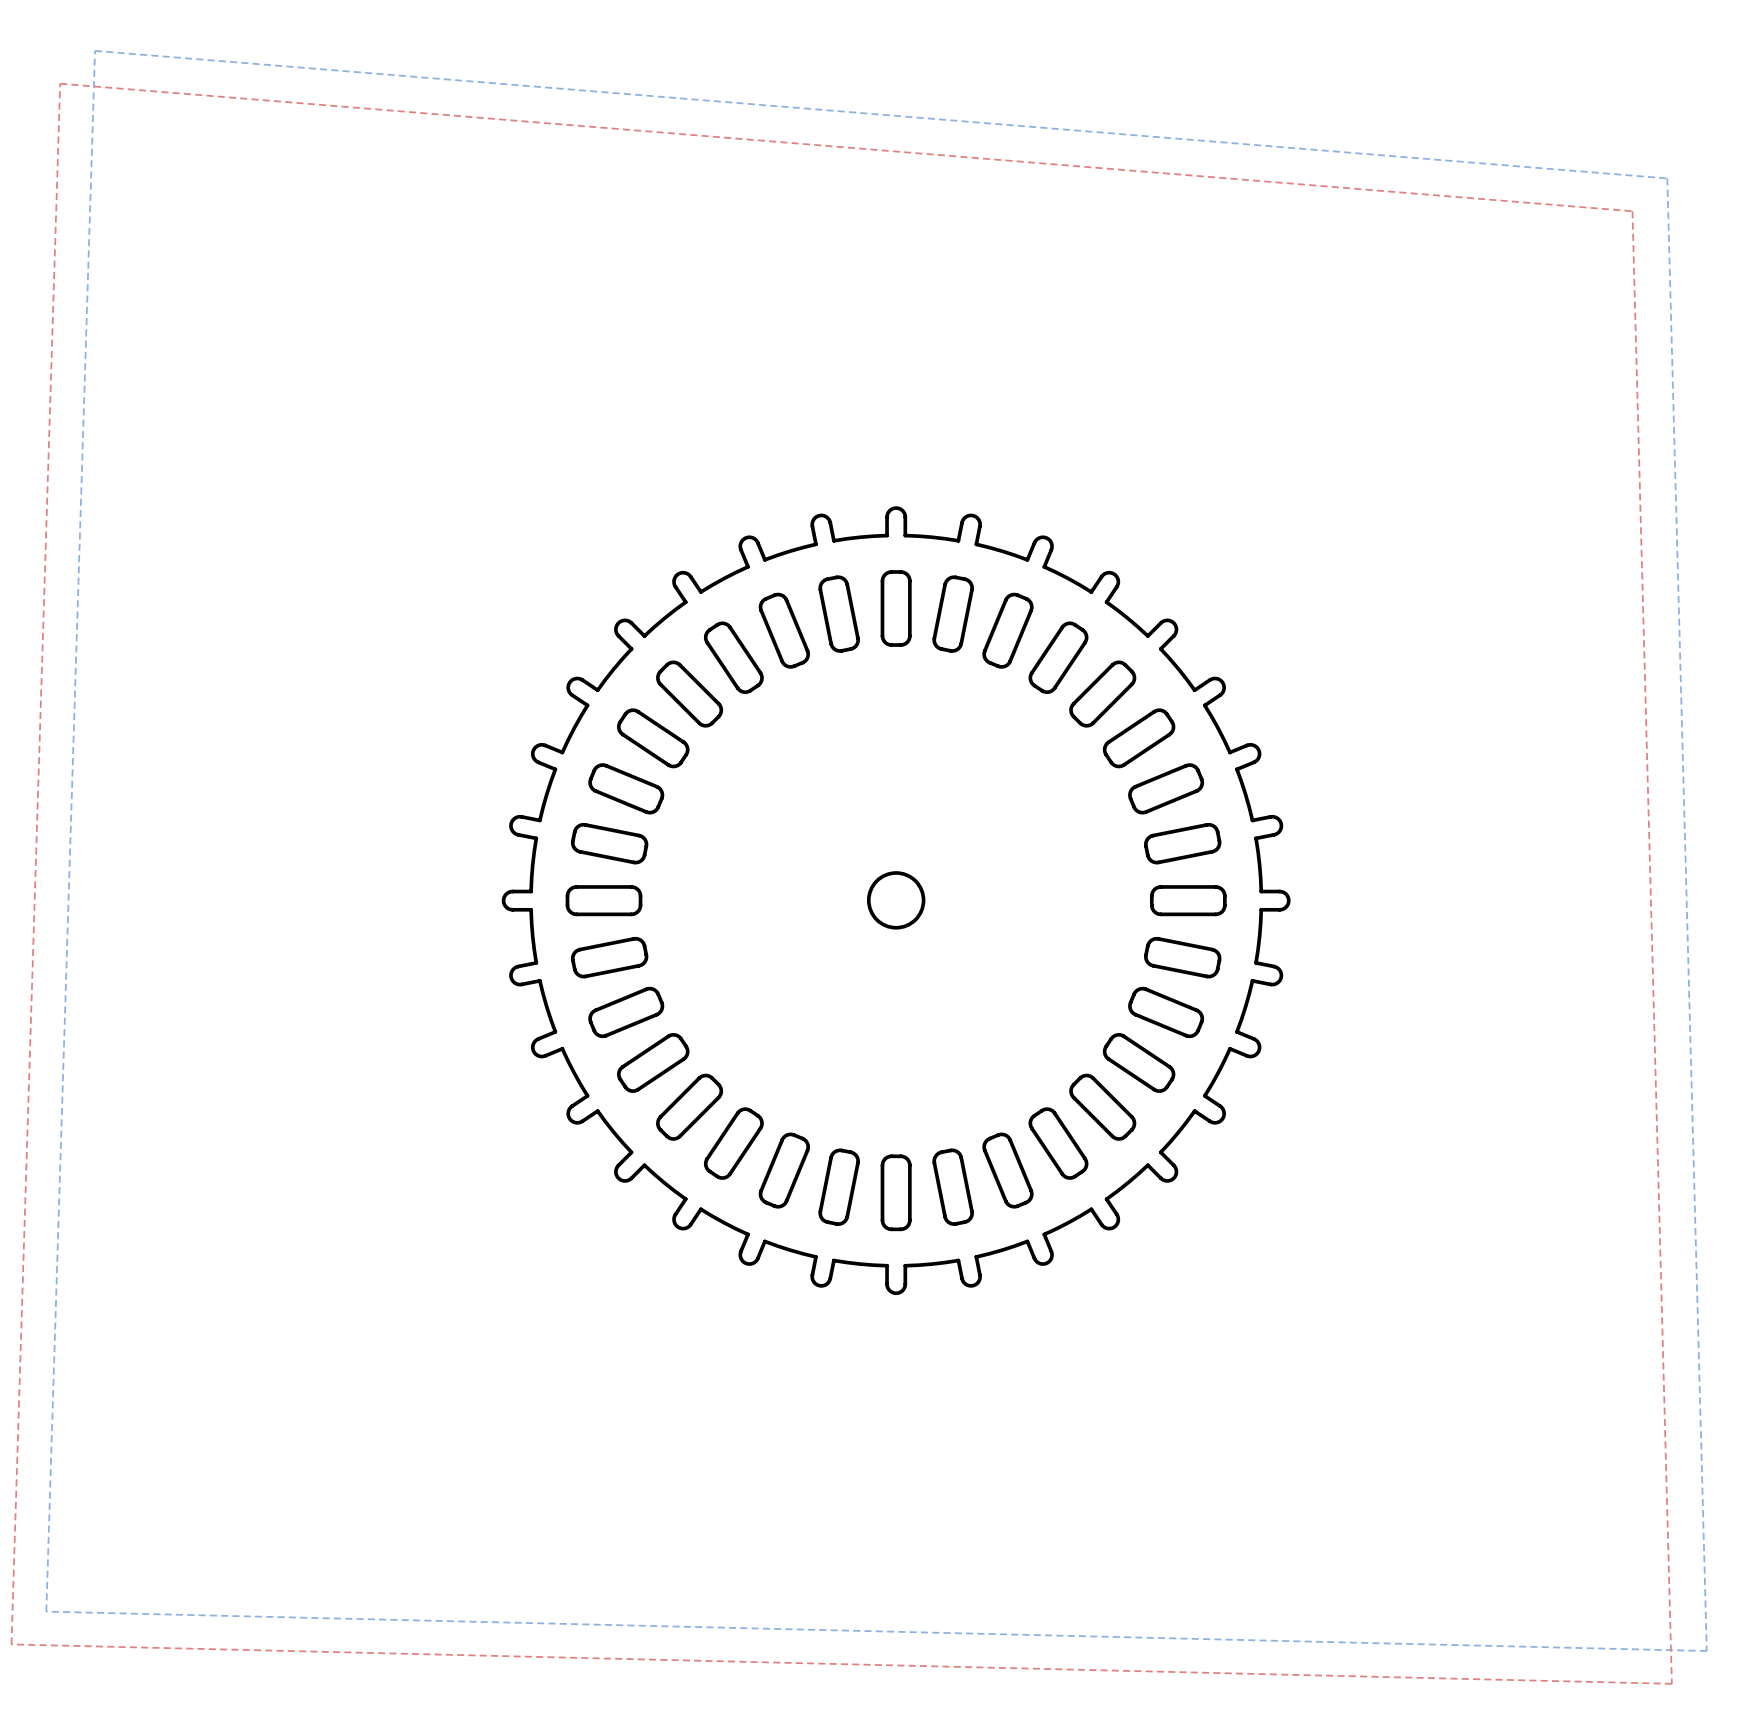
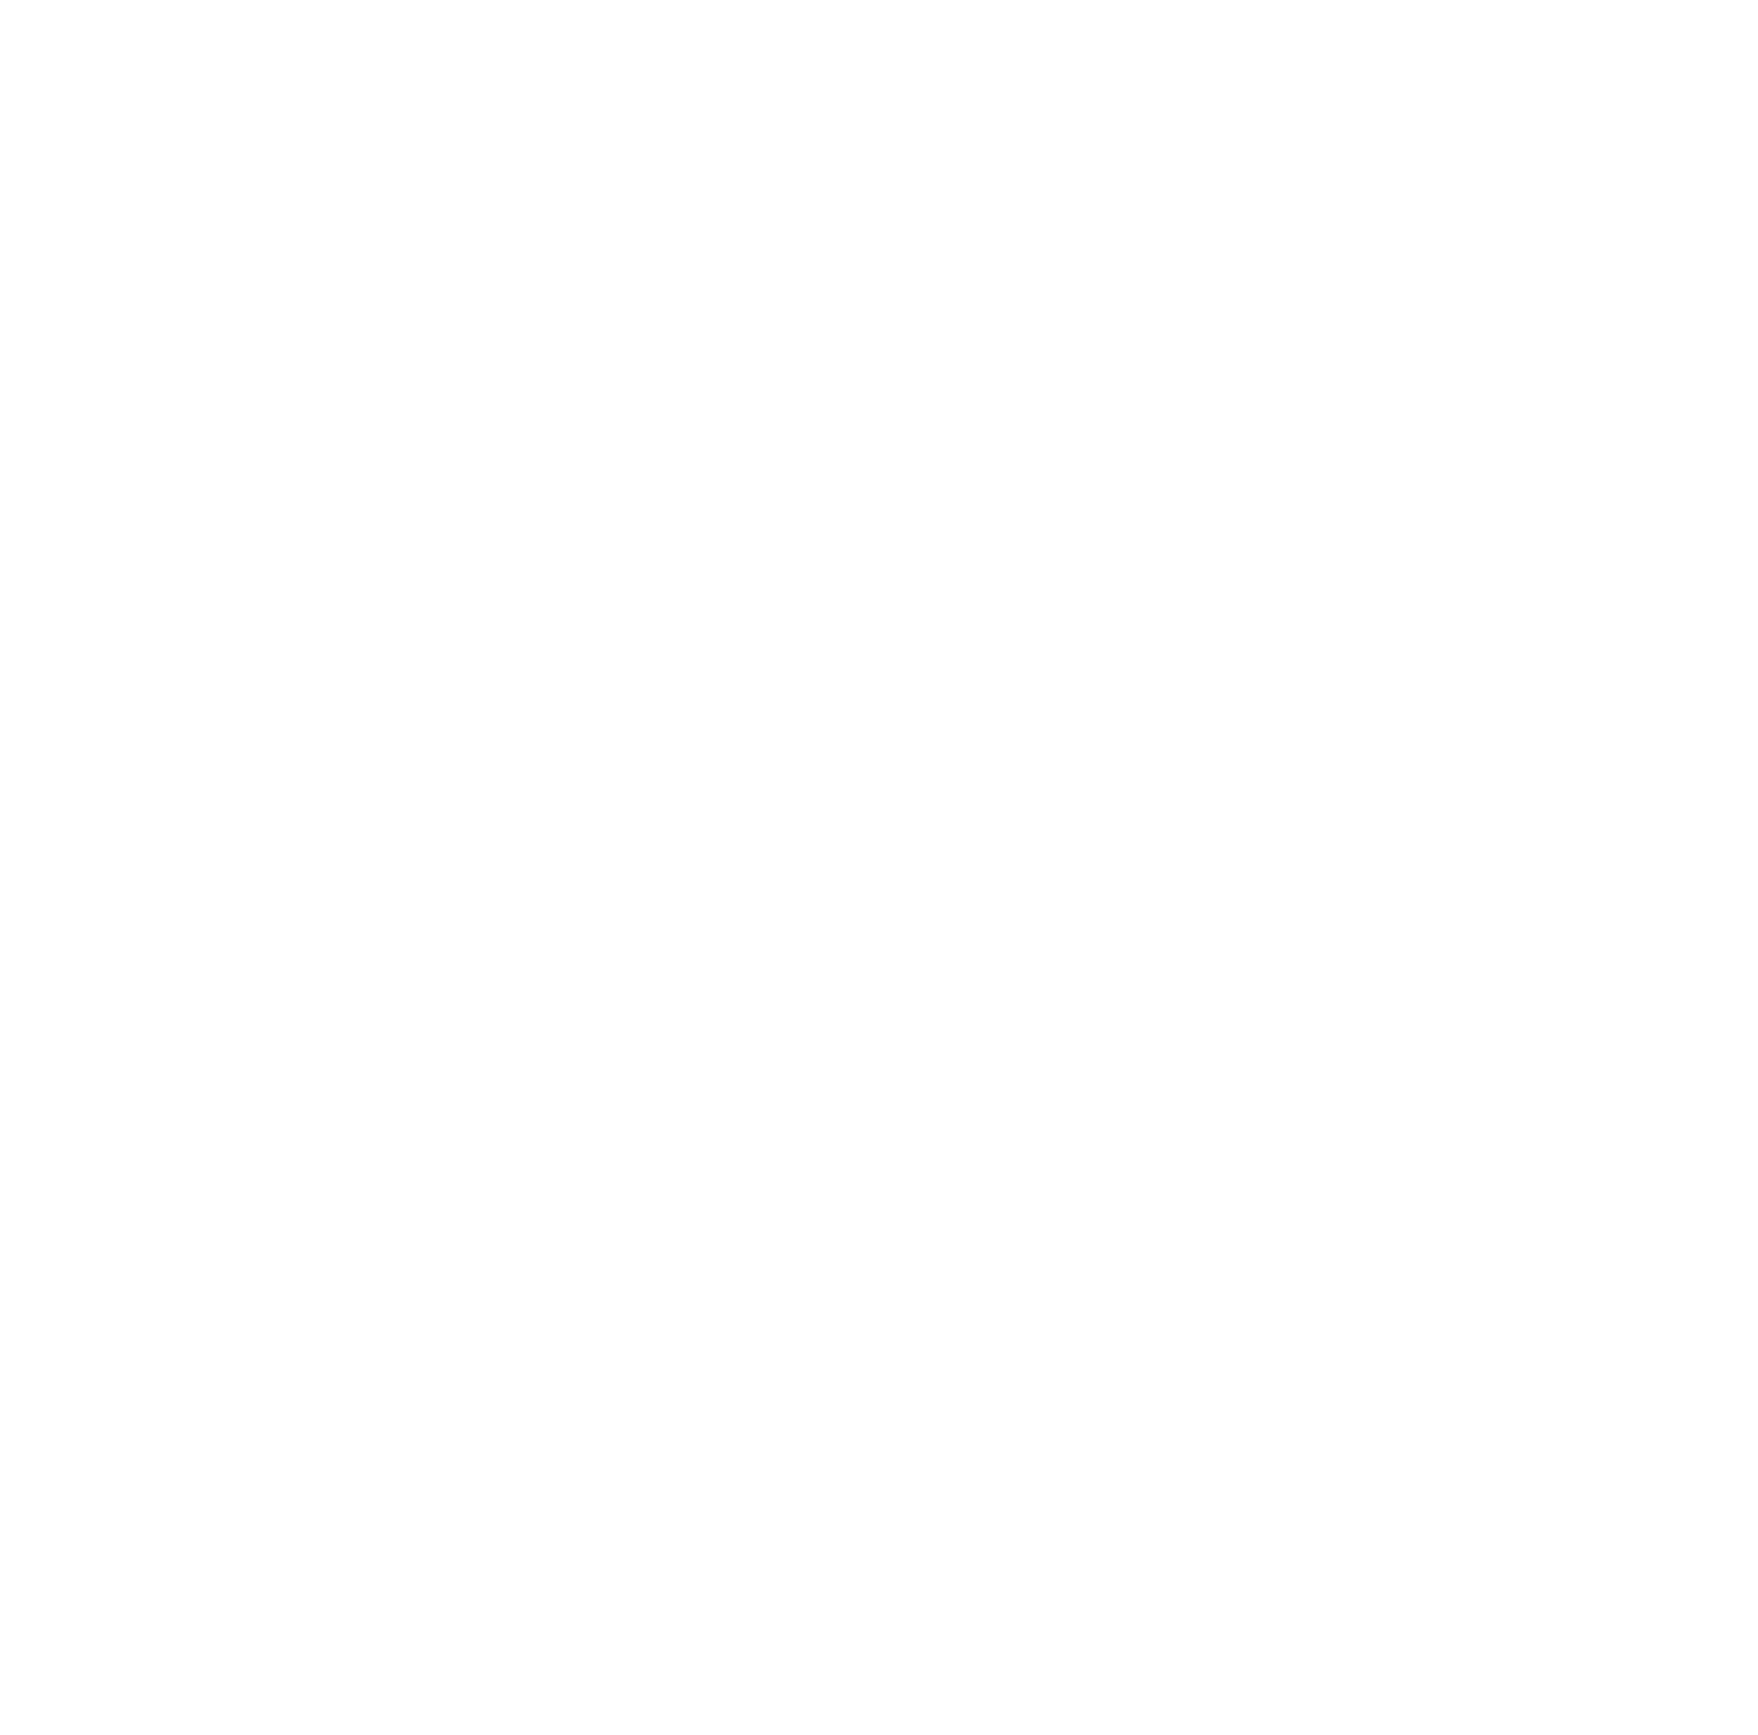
bottom zone outline: (95, 50) (46, 1611) (1706, 1651) (1667, 178) (95, 50) -> none
top zone outline: (60, 83) (11, 1644) (1671, 1683) (1632, 211) (60, 83) -> none
board edge: (887, 517) (887, 535) (833, 540) (828, 519) (824, 515) (818, 515) (813, 519) (812, 523) (815, 544) (764, 559) (756, 540) (751, 537) (745, 537) (741, 541) (740, 547) (748, 566) (700, 592) (689, 574) (683, 572) (678, 574) (674, 578) (674, 584) (685, 602) (644, 636) (629, 621) (623, 620) (618, 623) (615, 628) (617, 634) (631, 648) (597, 690) (580, 678) (574, 678) (569, 682) (568, 688) (570, 693) (587, 705) (562, 752) (543, 744) (537, 746) (533, 750) (533, 756) (536, 761) (555, 769) (539, 820) (519, 816) (514, 818) (511, 824) (511, 829) (516, 834) (536, 838) (531, 891) (510, 891) (505, 895) (503, 900) (505, 906) (510, 909) (531, 909) (536, 962) (516, 967) (511, 971) (511, 977) (514, 982) (519, 984) (539, 980) (555, 1031) (536, 1040) (533, 1045) (533, 1050) (537, 1055) (543, 1056) (562, 1048) (587, 1095) (570, 1107) (568, 1113) (569, 1118) (574, 1122) (580, 1122) (597, 1111) (631, 1152) (617, 1167) (615, 1173) (618, 1178) (623, 1180) (629, 1179) (644, 1165) (685, 1199) (674, 1216) (674, 1222) (678, 1227) (683, 1228) (689, 1226) (700, 1209) (748, 1234) (740, 1253) (741, 1259) (745, 1263) (751, 1263) (756, 1260) (764, 1241) (815, 1256) (812, 1277) (814, 1282) (819, 1285) (825, 1284) (829, 1280) (833, 1260) (887, 1265) (887, 1286) (890, 1291) (896, 1293) (901, 1291) (904, 1286) (905, 1265) (958, 1260) (962, 1280) (966, 1284) (972, 1285) (977, 1282) (980, 1277) (976, 1256) (1027, 1241) (1035, 1260) (1040, 1263) (1046, 1263) (1050, 1259) (1051, 1253) (1044, 1234) (1091, 1209) (1103, 1226) (1108, 1228) (1114, 1227) (1117, 1222) (1117, 1216) (1106, 1199) (1147, 1165) (1162, 1179) (1168, 1180) (1173, 1178) (1176, 1173) (1175, 1167) (1160, 1152) (1194, 1111) (1212, 1122) (1217, 1122) (1222, 1118) (1224, 1113) (1221, 1107) (1204, 1095) (1229, 1048) (1249, 1056) (1255, 1055) (1258, 1050) (1259, 1045) (1256, 1040) (1236, 1031) (1252, 980) (1272, 984) (1278, 982) (1281, 977) (1280, 971) (1276, 967) (1256, 962) (1261, 909) (1282, 909) (1286, 906) (1288, 900) (1286, 895) (1282, 891) (1261, 891) (1256, 838) (1276, 834) (1280, 829) (1281, 824) (1278, 818) (1272, 816) (1252, 820) (1236, 769) (1256, 761) (1259, 756) (1258, 750) (1255, 746) (1249, 744) (1229, 752) (1204, 705) (1221, 693) (1224, 688) (1222, 682) (1217, 678) (1212, 678) (1194, 690) (1160, 648) (1175, 634) (1176, 628) (1173, 623) (1168, 620) (1162, 621) (1147, 636) (1106, 602) (1117, 584) (1117, 578) (1114, 574) (1108, 572) (1103, 574) (1091, 592) (1044, 566) (1051, 547) (1050, 541) (1046, 537) (1040, 537) (1035, 540) (1027, 559) (976, 544) (980, 523) (977, 518) (973, 515) (968, 515) (963, 519) (958, 540) (905, 535) (904, 514) (898, 508) (890, 509) (887, 517) -> none
board edge: (891, 571) (904, 572) (909, 579) (909, 637) (907, 642) (901, 644) (888, 644) (882, 637) (882, 579) (886, 573) (891, 571) -> none
board edge: (836, 577) (824, 580) (820, 588) (831, 644) (834, 649) (840, 650) (854, 647) (858, 639) (846, 583) (843, 578) (840, 577) (836, 577) -> none
board edge: (955, 577) (968, 580) (972, 588) (960, 644) (957, 649) (951, 650) (938, 647) (934, 639) (945, 583) (950, 578) (955, 577) -> none
board edge: (774, 595) (763, 600) (760, 609) (782, 662) (787, 666) (792, 666) (805, 660) (807, 651) (786, 599) (780, 594) (774, 595) -> none
board edge: (1017, 595) (1029, 600) (1031, 609) (1009, 662) (1005, 666) (999, 666) (986, 660) (984, 651) (1006, 599) (1011, 594) (1017, 595) -> none
board edge: (717, 624) (707, 632) (706, 641) (738, 689) (743, 692) (749, 691) (760, 683) (761, 673) (729, 626) (724, 623) (717, 624) -> none
board edge: (1074, 624) (1085, 632) (1085, 641) (1053, 689) (1048, 692) (1043, 691) (1031, 683) (1031, 673) (1063, 626) (1069, 623) (1074, 624) -> none
board edge: (666, 665) (658, 674) (659, 683) (700, 723) (705, 725) (711, 723) (720, 713) (719, 704) (679, 664) (673, 662) (666, 665) -> none
board edge: (1112, 665) (1072, 705) (1072, 714) (1082, 724) (1087, 725) (1092, 723) (1133, 682) (1133, 674) (1124, 664) (1117, 662) (1112, 665) -> none
board edge: (638, 711) (685, 743) (687, 752) (679, 764) (675, 766) (669, 765) (621, 732) (618, 725) (626, 713) (632, 710) (638, 711) -> none
board edge: (1154, 711) (1106, 743) (1105, 752) (1112, 764) (1118, 766) (1122, 765) (1171, 732) (1173, 725) (1166, 713) (1159, 710) (1154, 711) -> none
board edge: (606, 765) (658, 787) (662, 796) (657, 809) (652, 812) (647, 812) (593, 789) (590, 782) (594, 769) (599, 765) (606, 765) -> none
board edge: (1186, 765) (1133, 787) (1129, 796) (1135, 809) (1140, 812) (1144, 812) (1198, 789) (1202, 782) (1197, 769) (1192, 765) (1186, 765) -> none
board edge: (585, 824) (641, 836) (646, 843) (643, 857) (639, 861) (635, 862) (577, 850) (572, 844) (575, 830) (579, 825) (585, 824) -> none
board edge: (1206, 824) (1150, 836) (1145, 843) (1148, 857) (1151, 861) (1157, 862) (1214, 850) (1219, 844) (1217, 830) (1212, 825) (1209, 824) (1206, 824) -> none
round board edge: [866, 871, 926, 930] -> none
board edge: (576, 886) (633, 887) (640, 893) (640, 907) (636, 912) (632, 914) (574, 914) (568, 908) (567, 894) (571, 888) (576, 886) -> none
board edge: (1160, 886) (1218, 887) (1224, 893) (1224, 907) (1221, 912) (1216, 914) (1158, 914) (1152, 908) (1151, 894) (1155, 888) (1160, 886) -> none
board edge: (633, 938) (577, 950) (572, 957) (575, 971) (579, 975) (584, 976) (641, 964) (646, 958) (644, 944) (640, 940) (633, 938) -> none
board edge: (1158, 938) (1214, 950) (1219, 957) (1216, 971) (1212, 975) (1208, 976) (1150, 964) (1146, 958) (1148, 944) (1152, 939) (1158, 938) -> none
board edge: (646, 989) (593, 1011) (590, 1019) (595, 1032) (600, 1035) (605, 1035) (658, 1013) (662, 1006) (657, 993) (652, 988) (646, 989) -> none
board edge: (1146, 989) (1198, 1011) (1202, 1019) (1196, 1032) (1192, 1035) (1187, 1035) (1133, 1013) (1129, 1006) (1134, 993) (1139, 989) (1146, 989) -> none
board edge: (668, 1036) (621, 1068) (619, 1077) (626, 1088) (632, 1091) (637, 1090) (685, 1057) (687, 1049) (680, 1037) (675, 1035) (668, 1036) -> none
board edge: (1123, 1036) (1171, 1068) (1173, 1077) (1165, 1088) (1159, 1091) (1155, 1090) (1106, 1057) (1104, 1049) (1111, 1037) (1118, 1034) (1123, 1036) -> none
board edge: (699, 1078) (659, 1118) (659, 1127) (668, 1137) (674, 1138) (679, 1137) (720, 1095) (720, 1087) (711, 1077) (704, 1075) (699, 1078) -> none
board edge: (1080, 1078) (1071, 1087) (1072, 1096) (1113, 1137) (1118, 1138) (1124, 1137) (1133, 1126) (1132, 1117) (1092, 1077) (1085, 1075) (1080, 1078) -> none
board edge: (750, 1110) (760, 1118) (761, 1127) (729, 1174) (724, 1177) (718, 1177) (707, 1168) (706, 1159) (738, 1112) (744, 1109) (750, 1110) -> none
board edge: (1041, 1110) (1031, 1118) (1031, 1127) (1063, 1174) (1068, 1177) (1073, 1177) (1085, 1168) (1085, 1159) (1053, 1112) (1048, 1109) (1041, 1110) -> none
board edge: (794, 1135) (805, 1140) (807, 1149) (786, 1202) (781, 1206) (775, 1206) (763, 1200) (760, 1191) (782, 1138) (788, 1134) (794, 1135) -> none
board edge: (998, 1135) (986, 1140) (984, 1149) (1006, 1202) (1010, 1206) (1016, 1206) (1029, 1200) (1031, 1191) (1009, 1138) (1005, 1135) (998, 1135) -> none
board edge: (841, 1150) (854, 1153) (858, 1161) (846, 1217) (843, 1222) (837, 1224) (824, 1220) (820, 1212) (831, 1156) (836, 1151) (841, 1150) -> none
board edge: (950, 1150) (938, 1153) (934, 1161) (945, 1217) (948, 1222) (954, 1224) (968, 1220) (972, 1212) (960, 1156) (956, 1151) (950, 1150) -> none
board edge: (891, 1156) (904, 1157) (909, 1164) (909, 1221) (907, 1226) (901, 1229) (888, 1228) (882, 1221) (882, 1164) (886, 1158) (891, 1156) -> none

